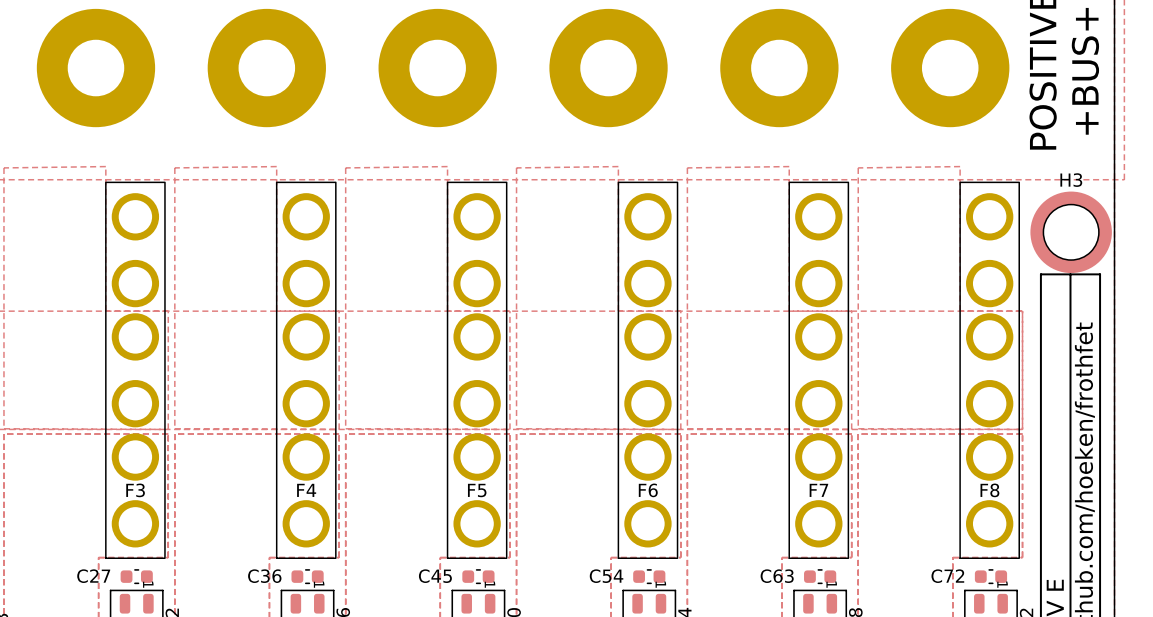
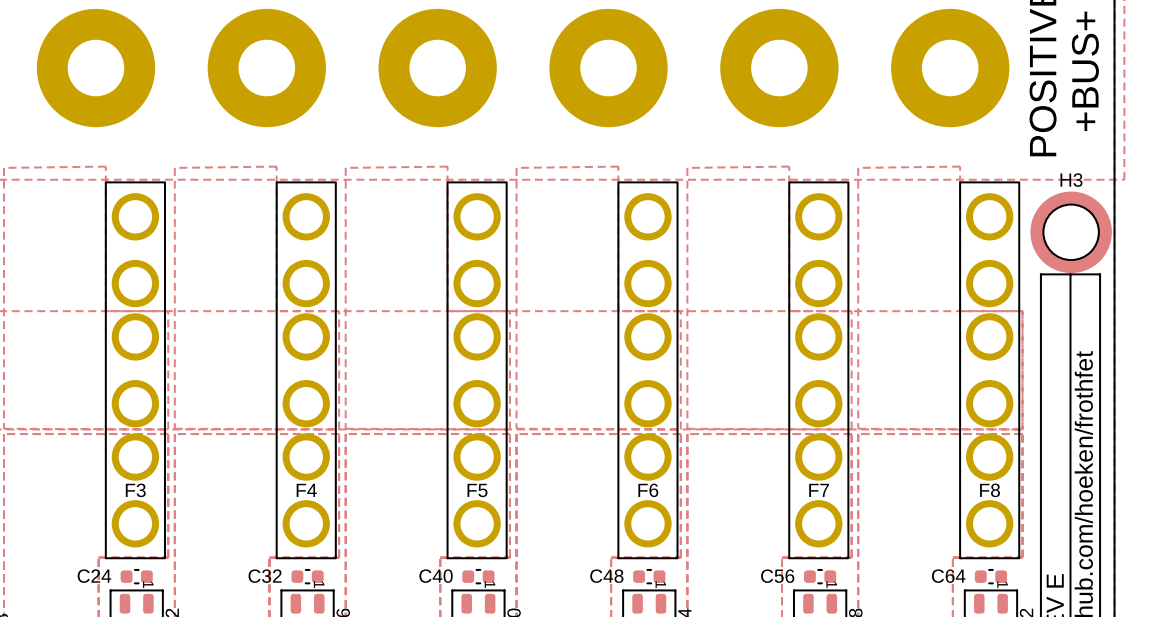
C27 name: C27 (93, 576) -> C24 (94, 576)
C36 name: C36 (264, 576) -> C32 (265, 576)
C45 name: C45 (435, 576) -> C40 (436, 576)
C54 name: C54 (606, 576) -> C48 (606, 576)
C63 name: C63 (777, 576) -> C56 (777, 576)
C72 name: C72 (947, 576) -> C64 (948, 576)

